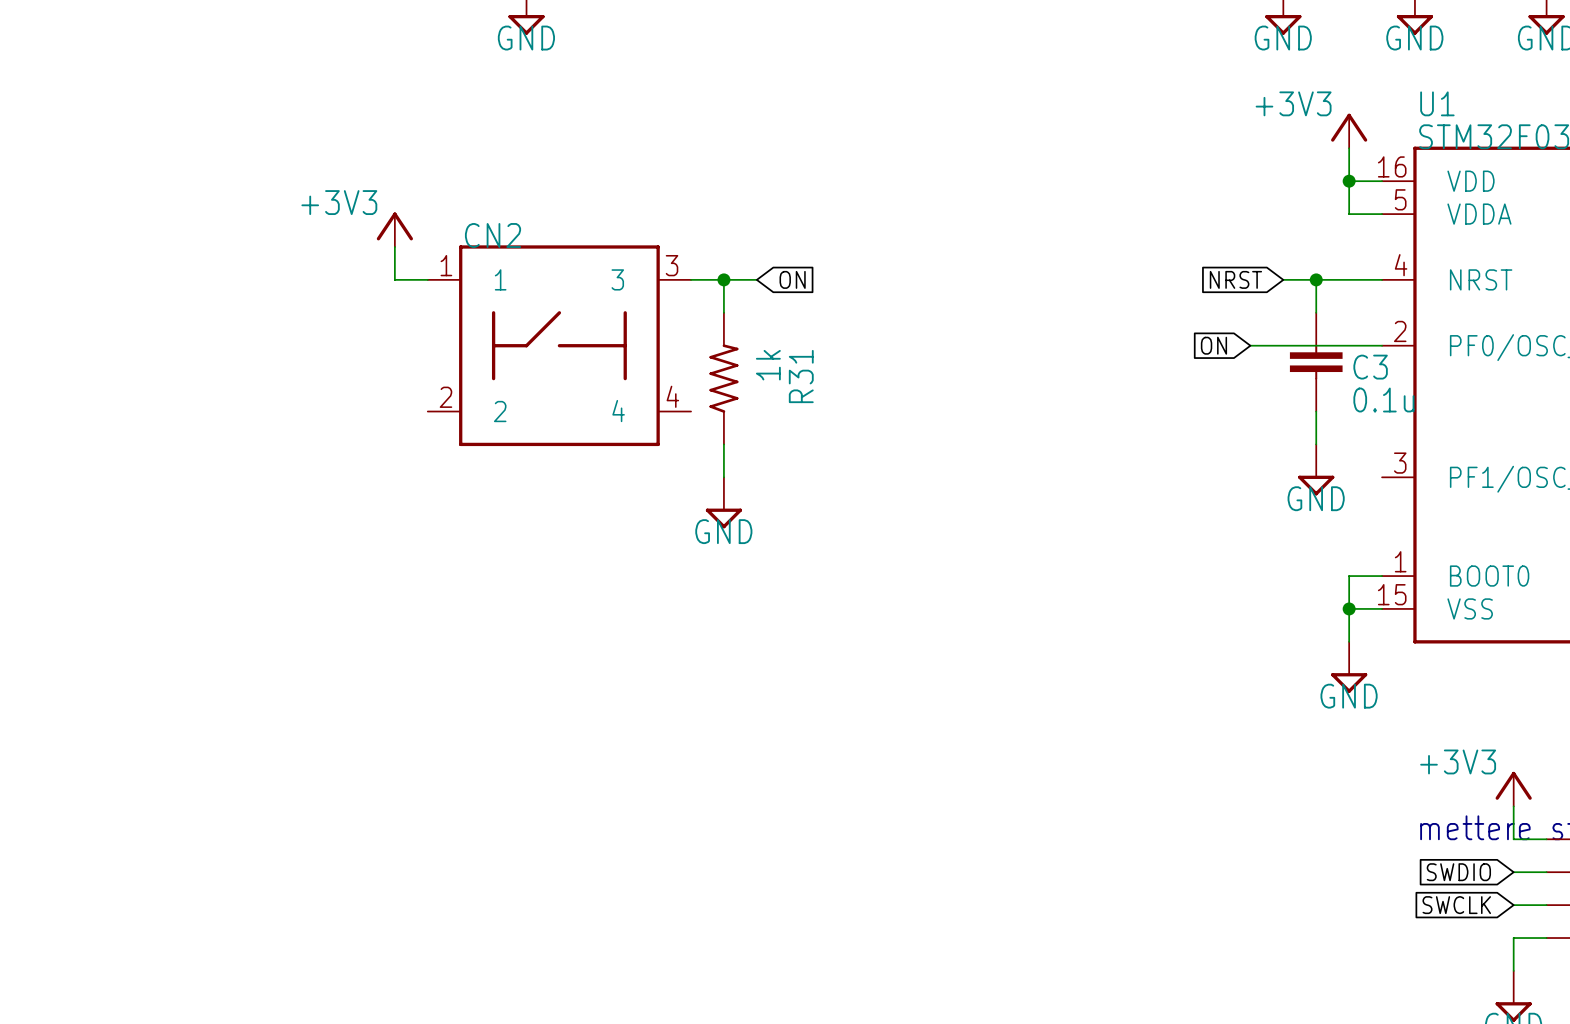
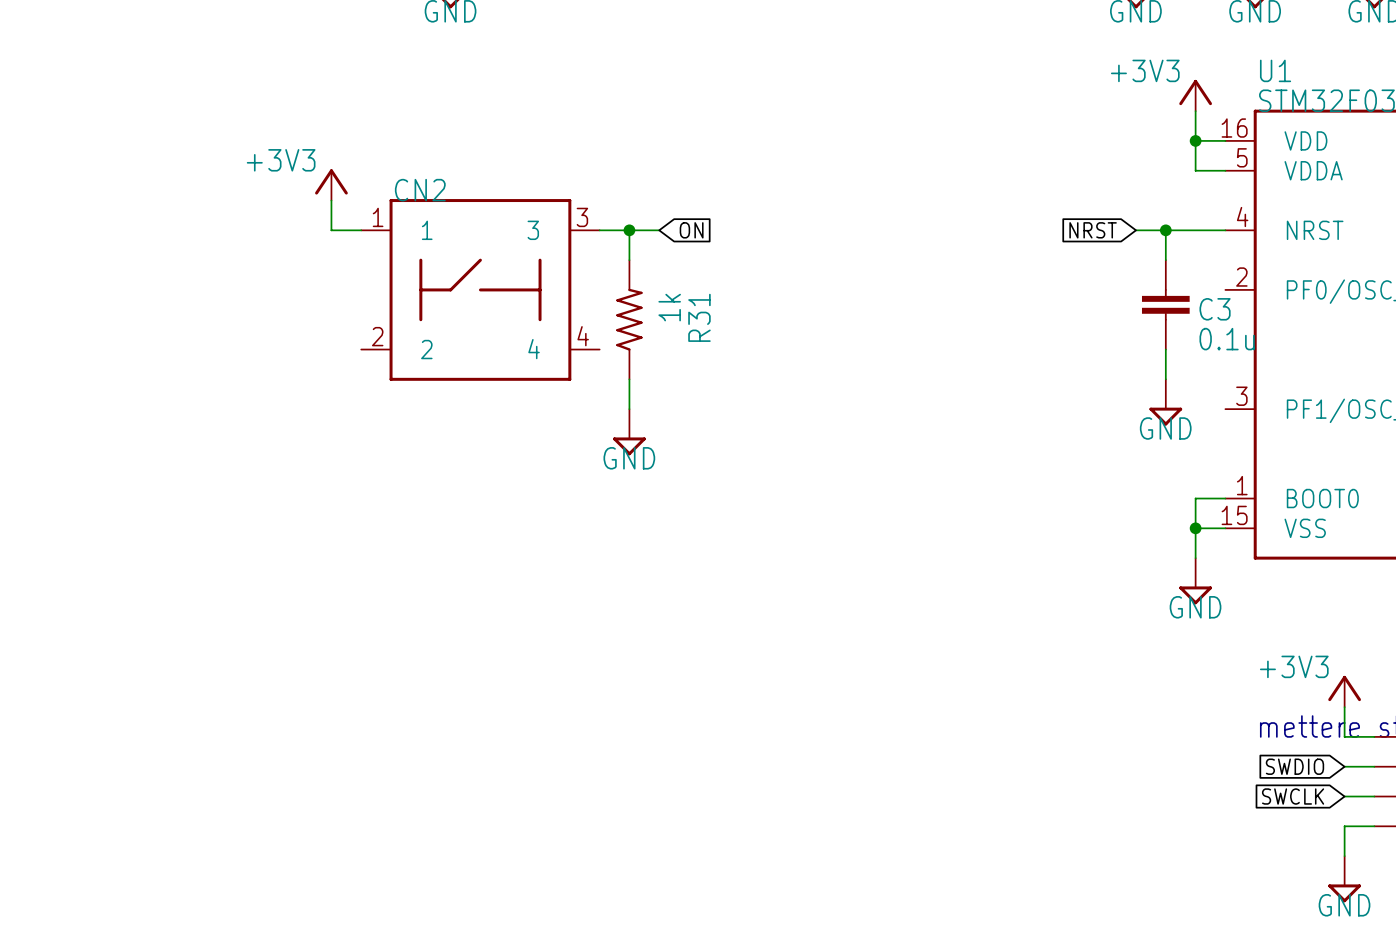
global label: ON (1213, 345) -> none
wire: (1250, 345) (1382, 345) -> none

